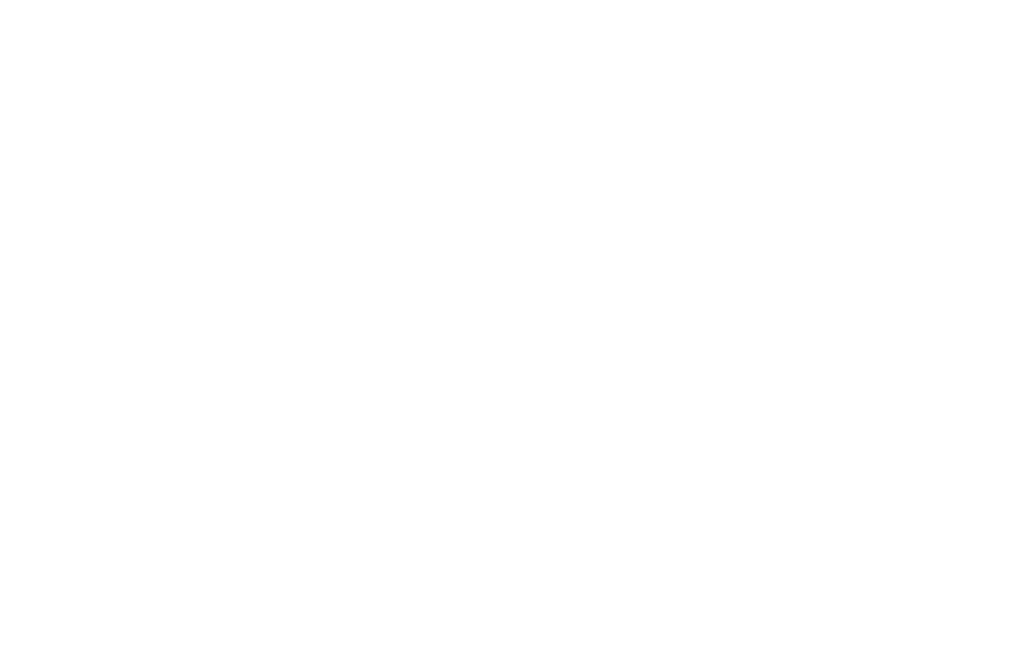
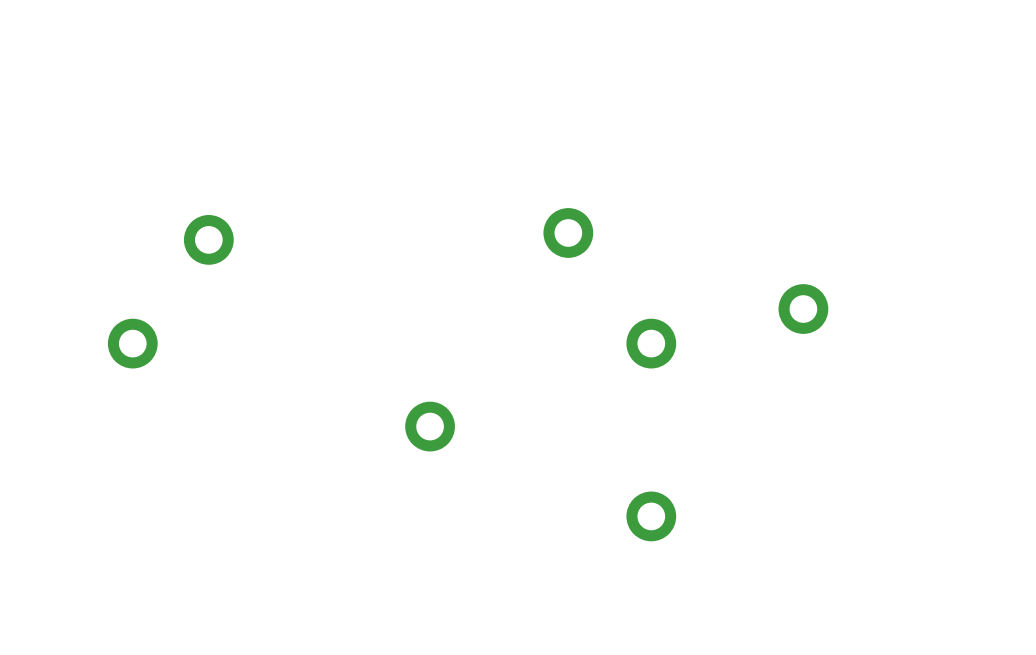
via: none -> (568, 232)
via: none -> (208, 239)
via: none -> (803, 309)
via: none -> (132, 343)
via: none -> (651, 343)
via: none -> (430, 426)
via: none -> (651, 516)

